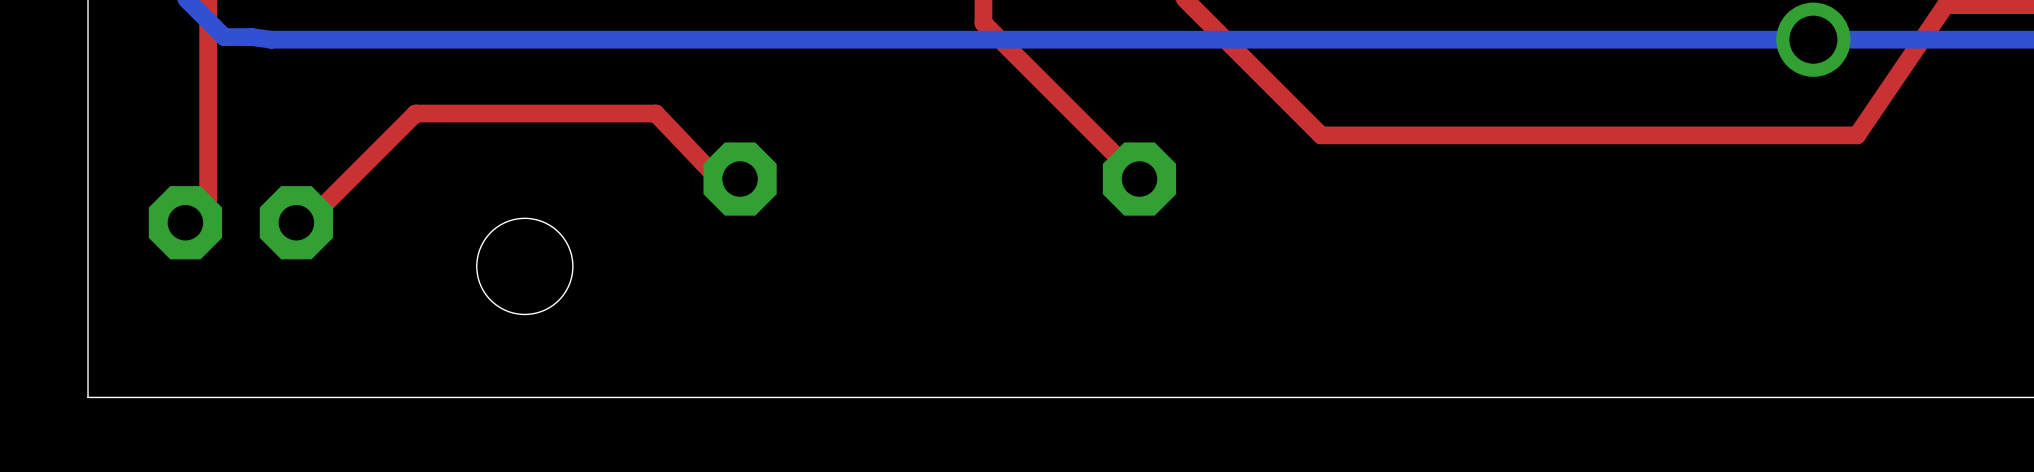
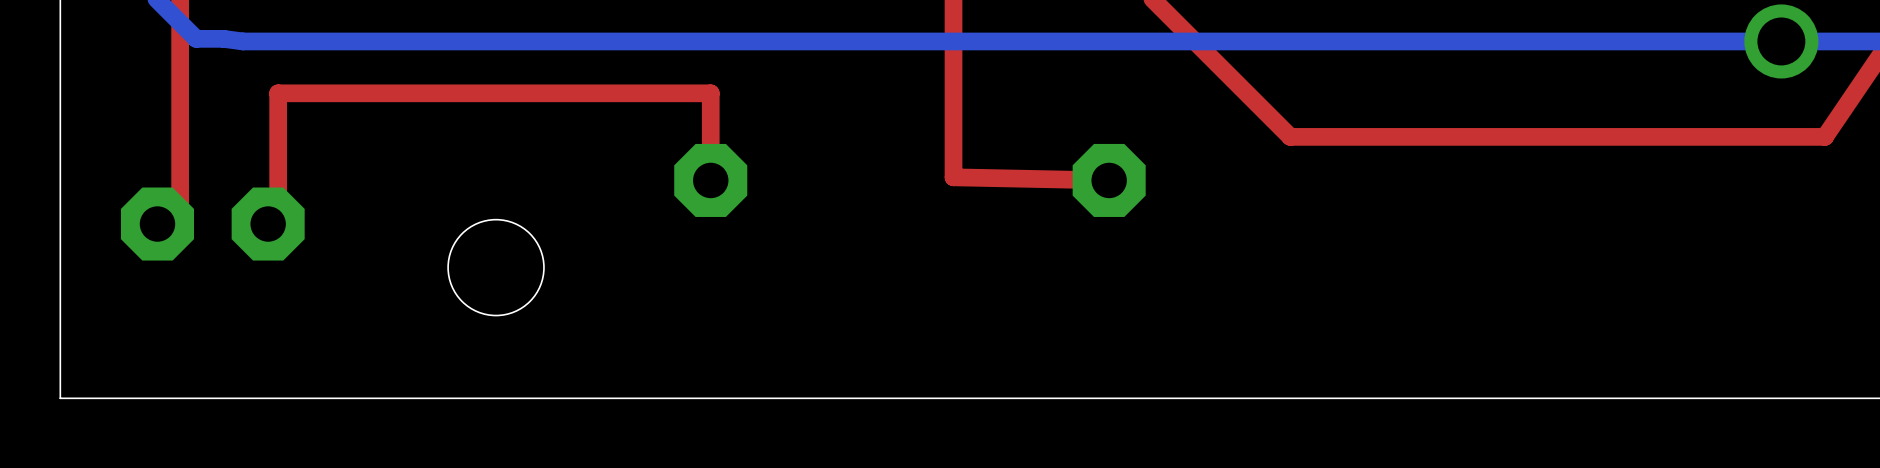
top track: (983, 23) (1139, 179) -> (953, 24) (953, 177) (1109, 180)
top track: (740, 179) (718, 179) (655, 113) (415, 113) (306, 222) -> (710, 180) (710, 93) (278, 93) (278, 224)

